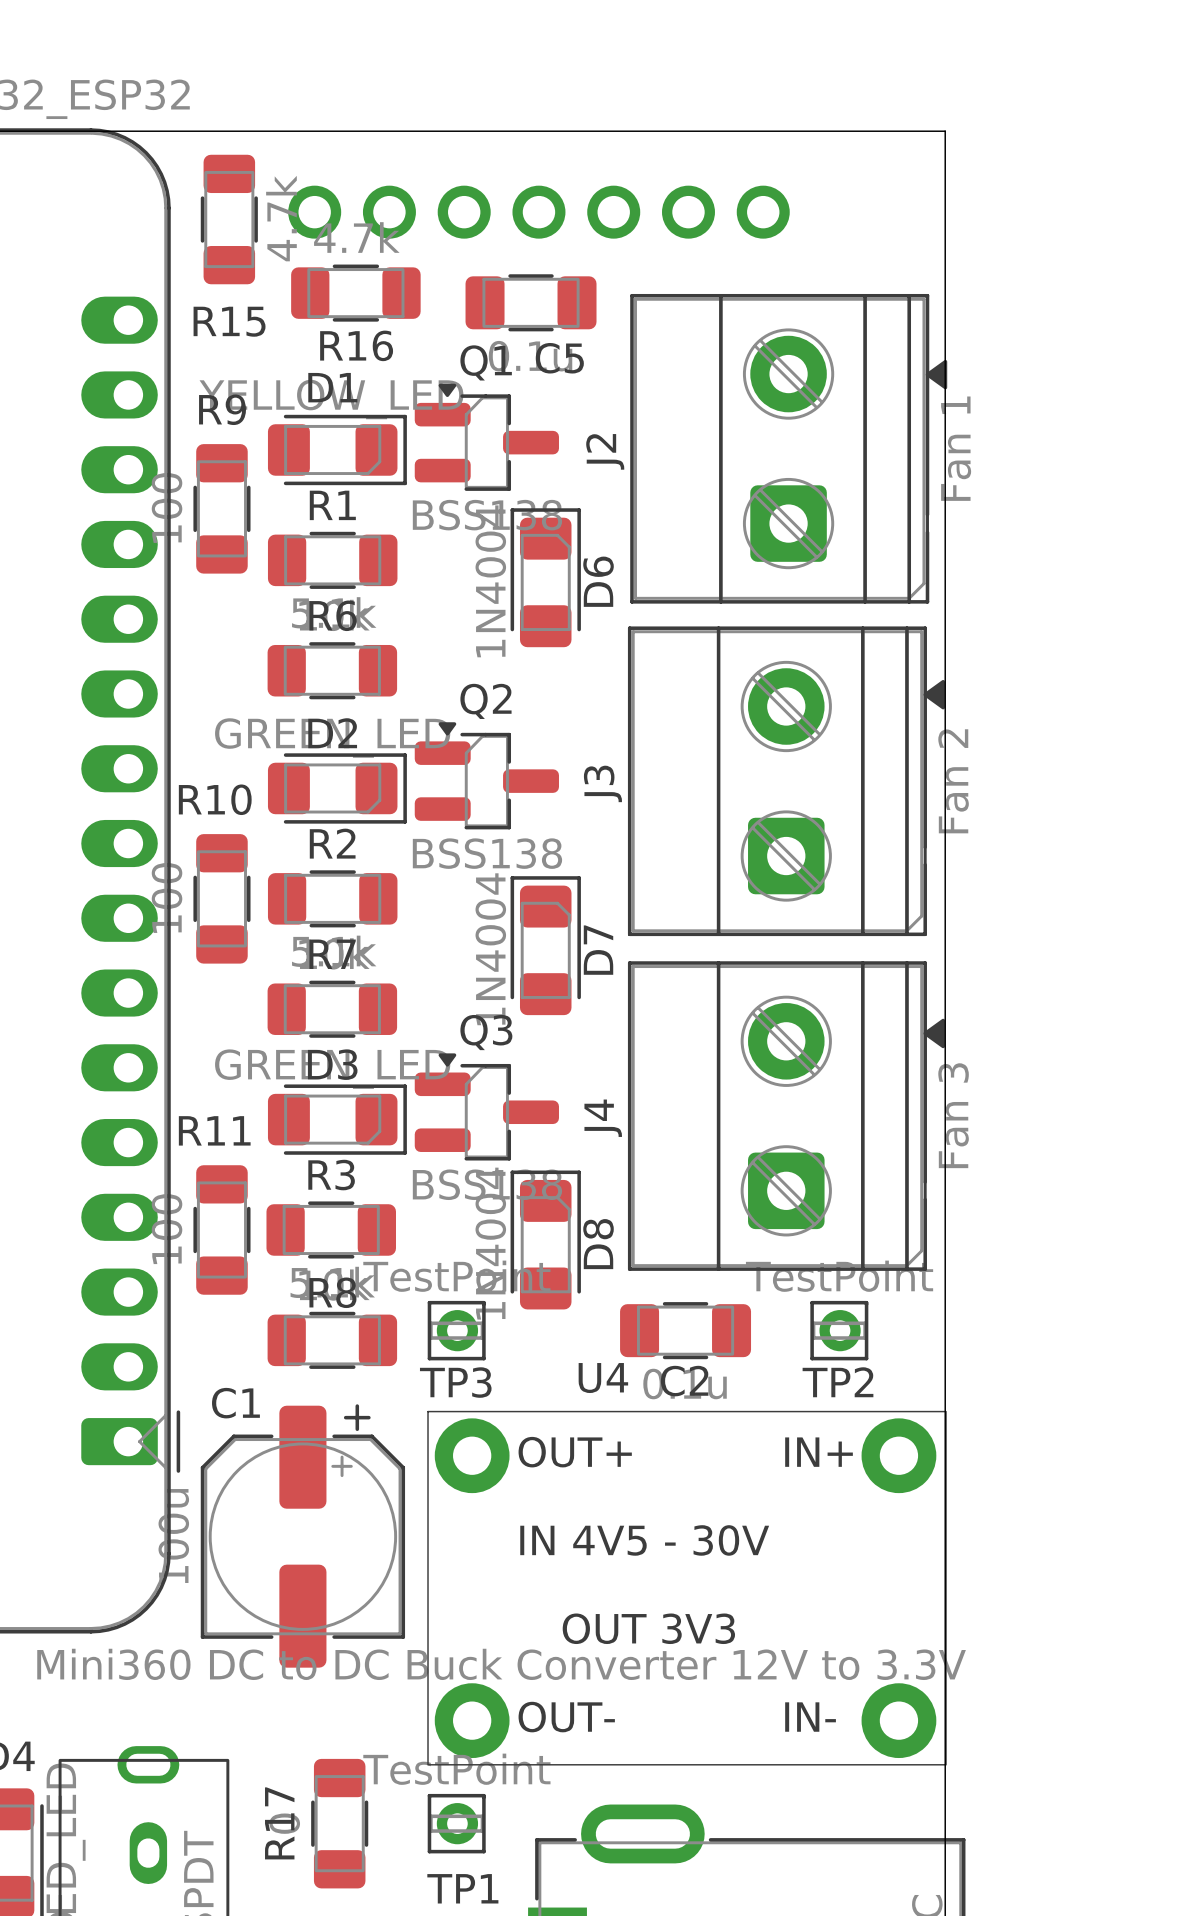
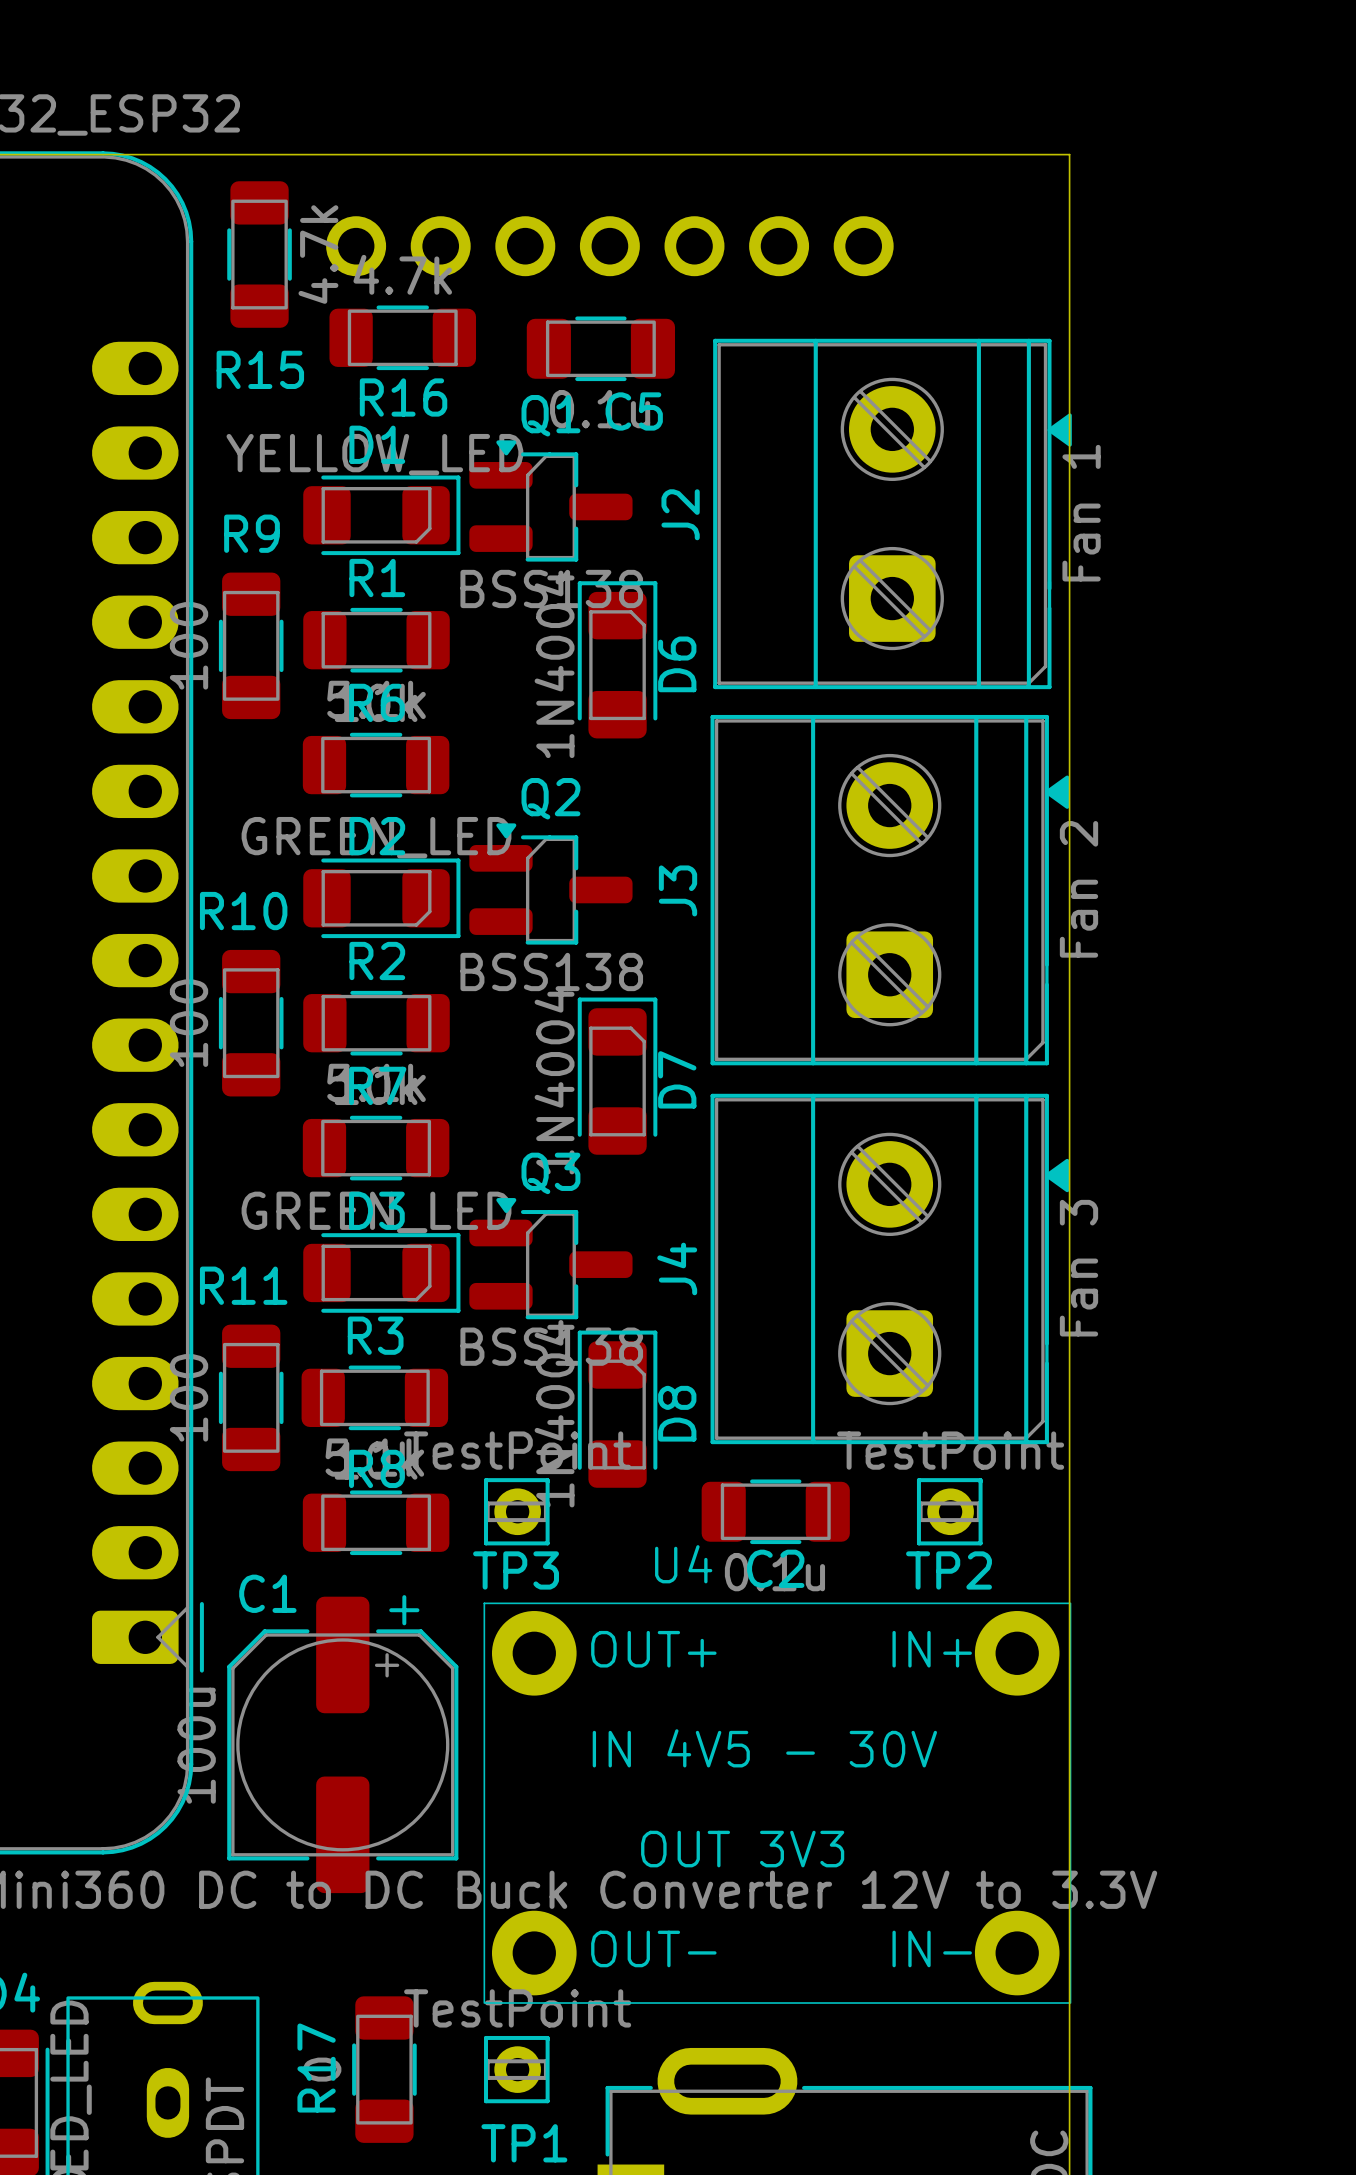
R9 position: (221, 508) -> (251, 645)

